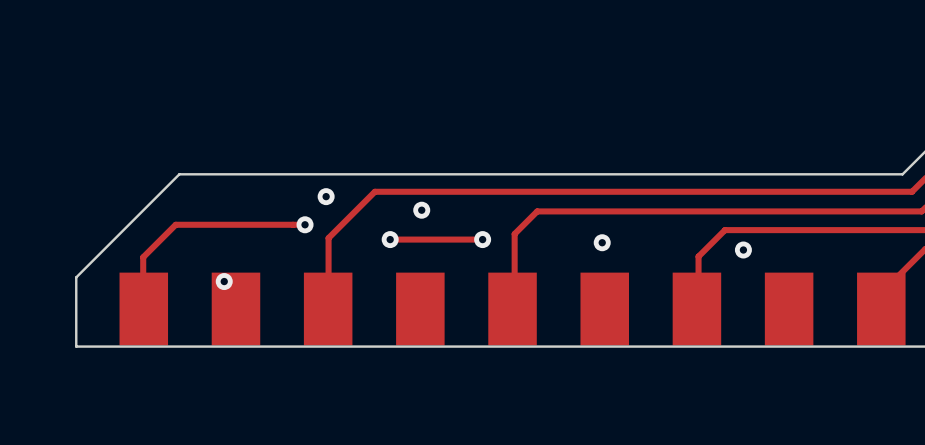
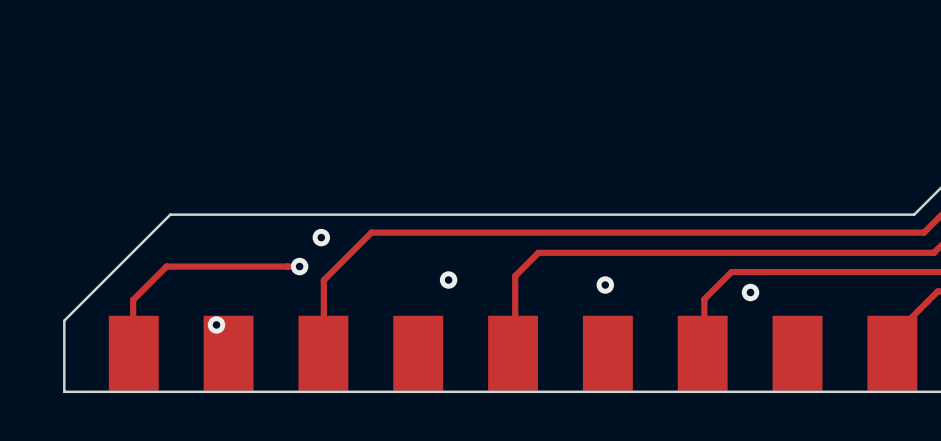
via: (421, 210) -> none
via: none -> (448, 280)
track: (390, 239) (482, 239) -> none
via: (390, 239) -> none
via: (482, 239) -> none

